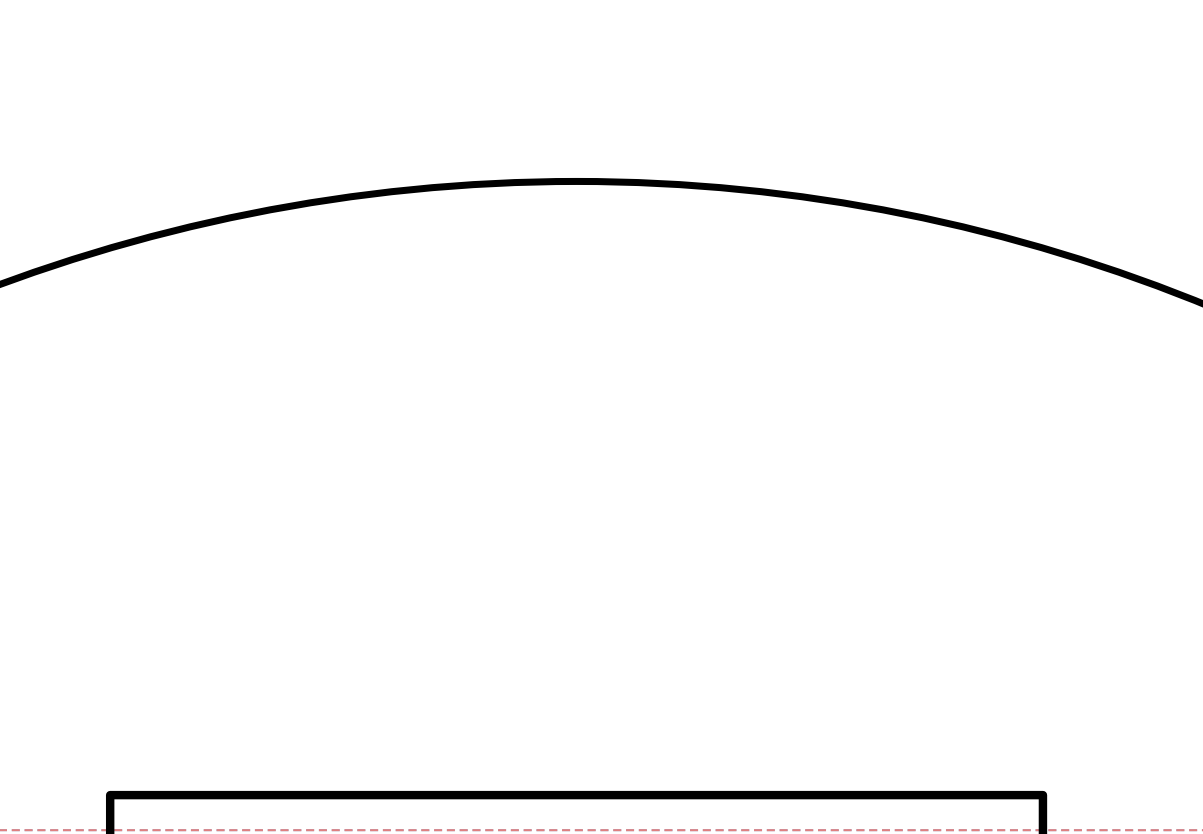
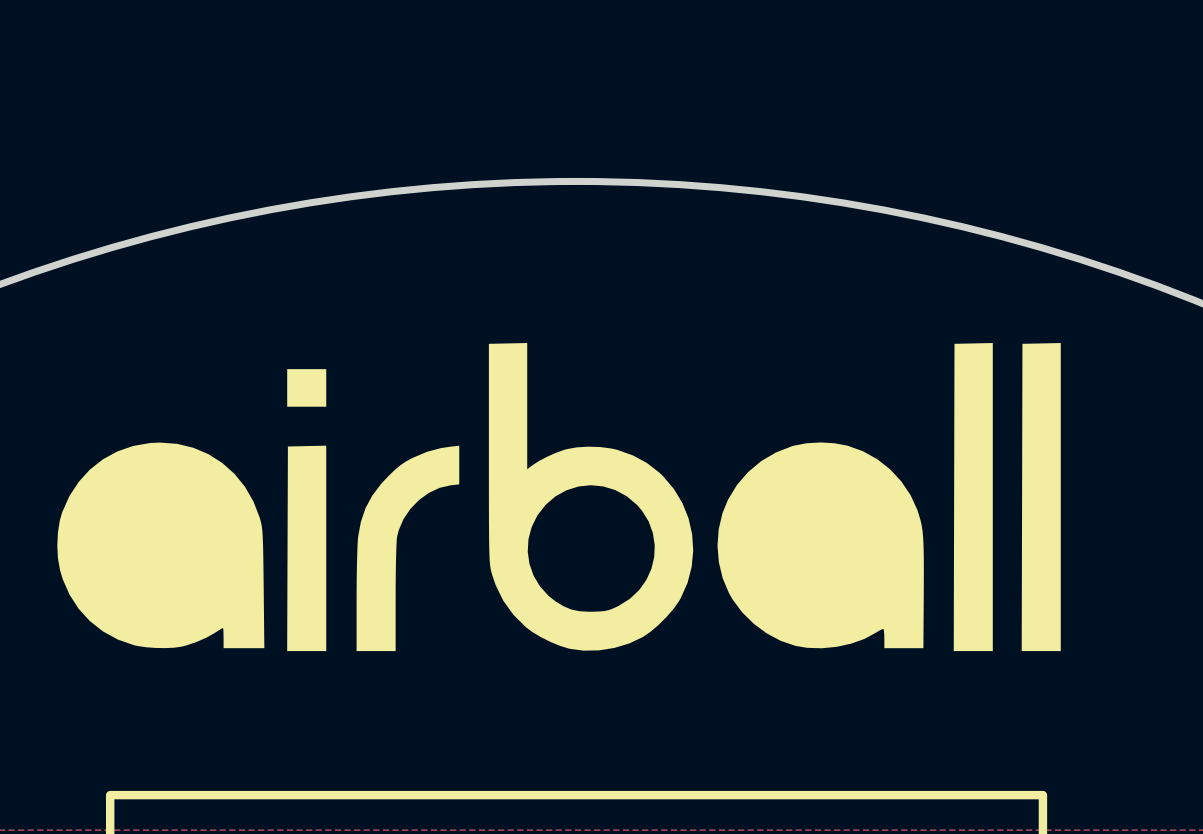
drawing: none -> [57, 343, 1061, 652]

